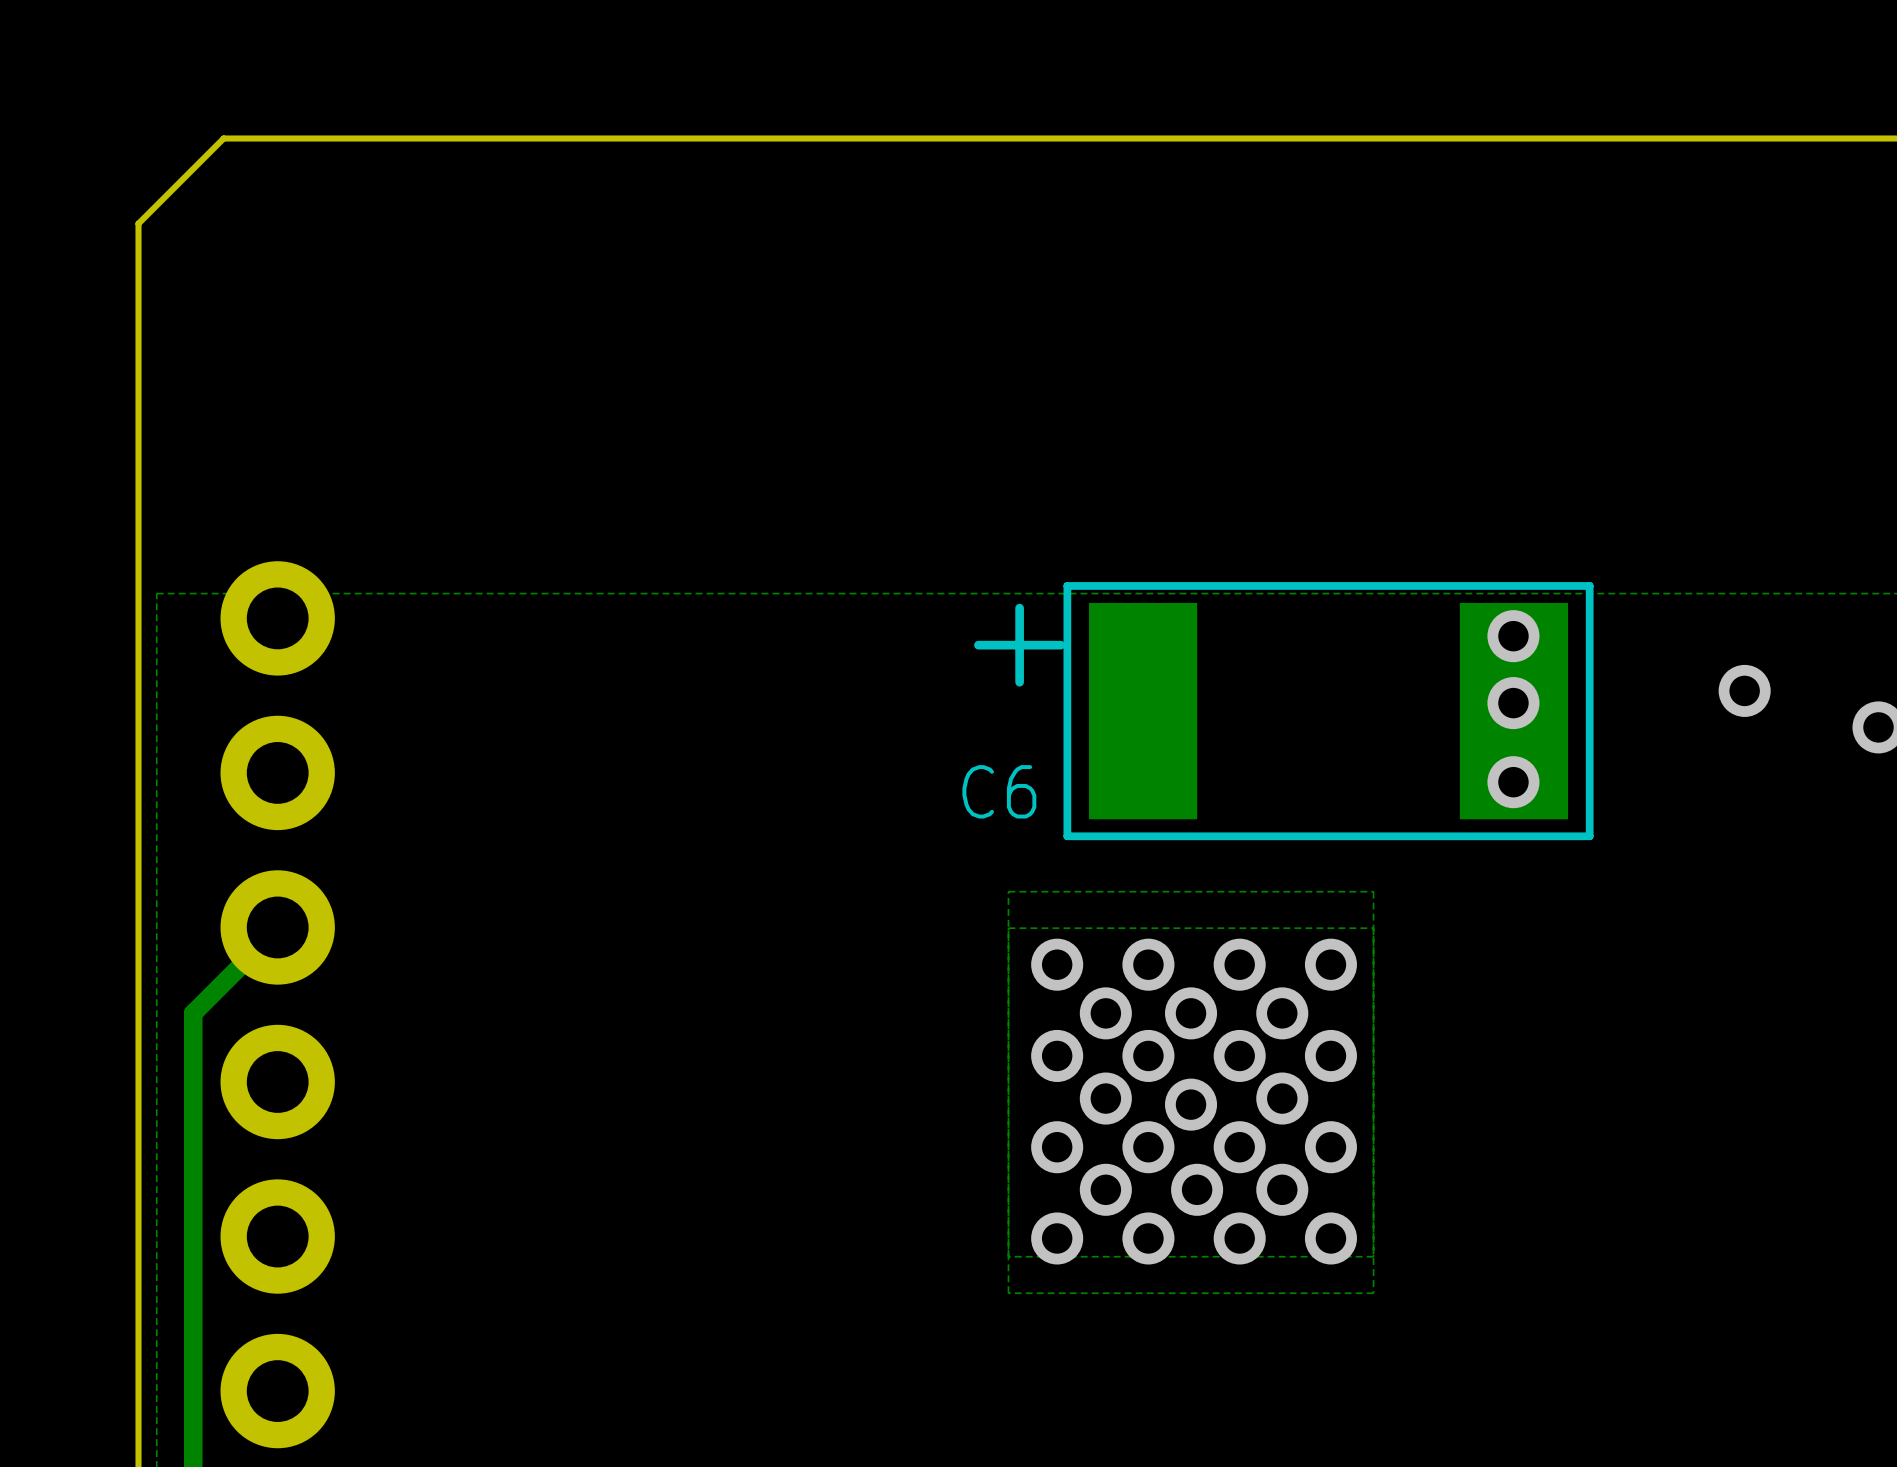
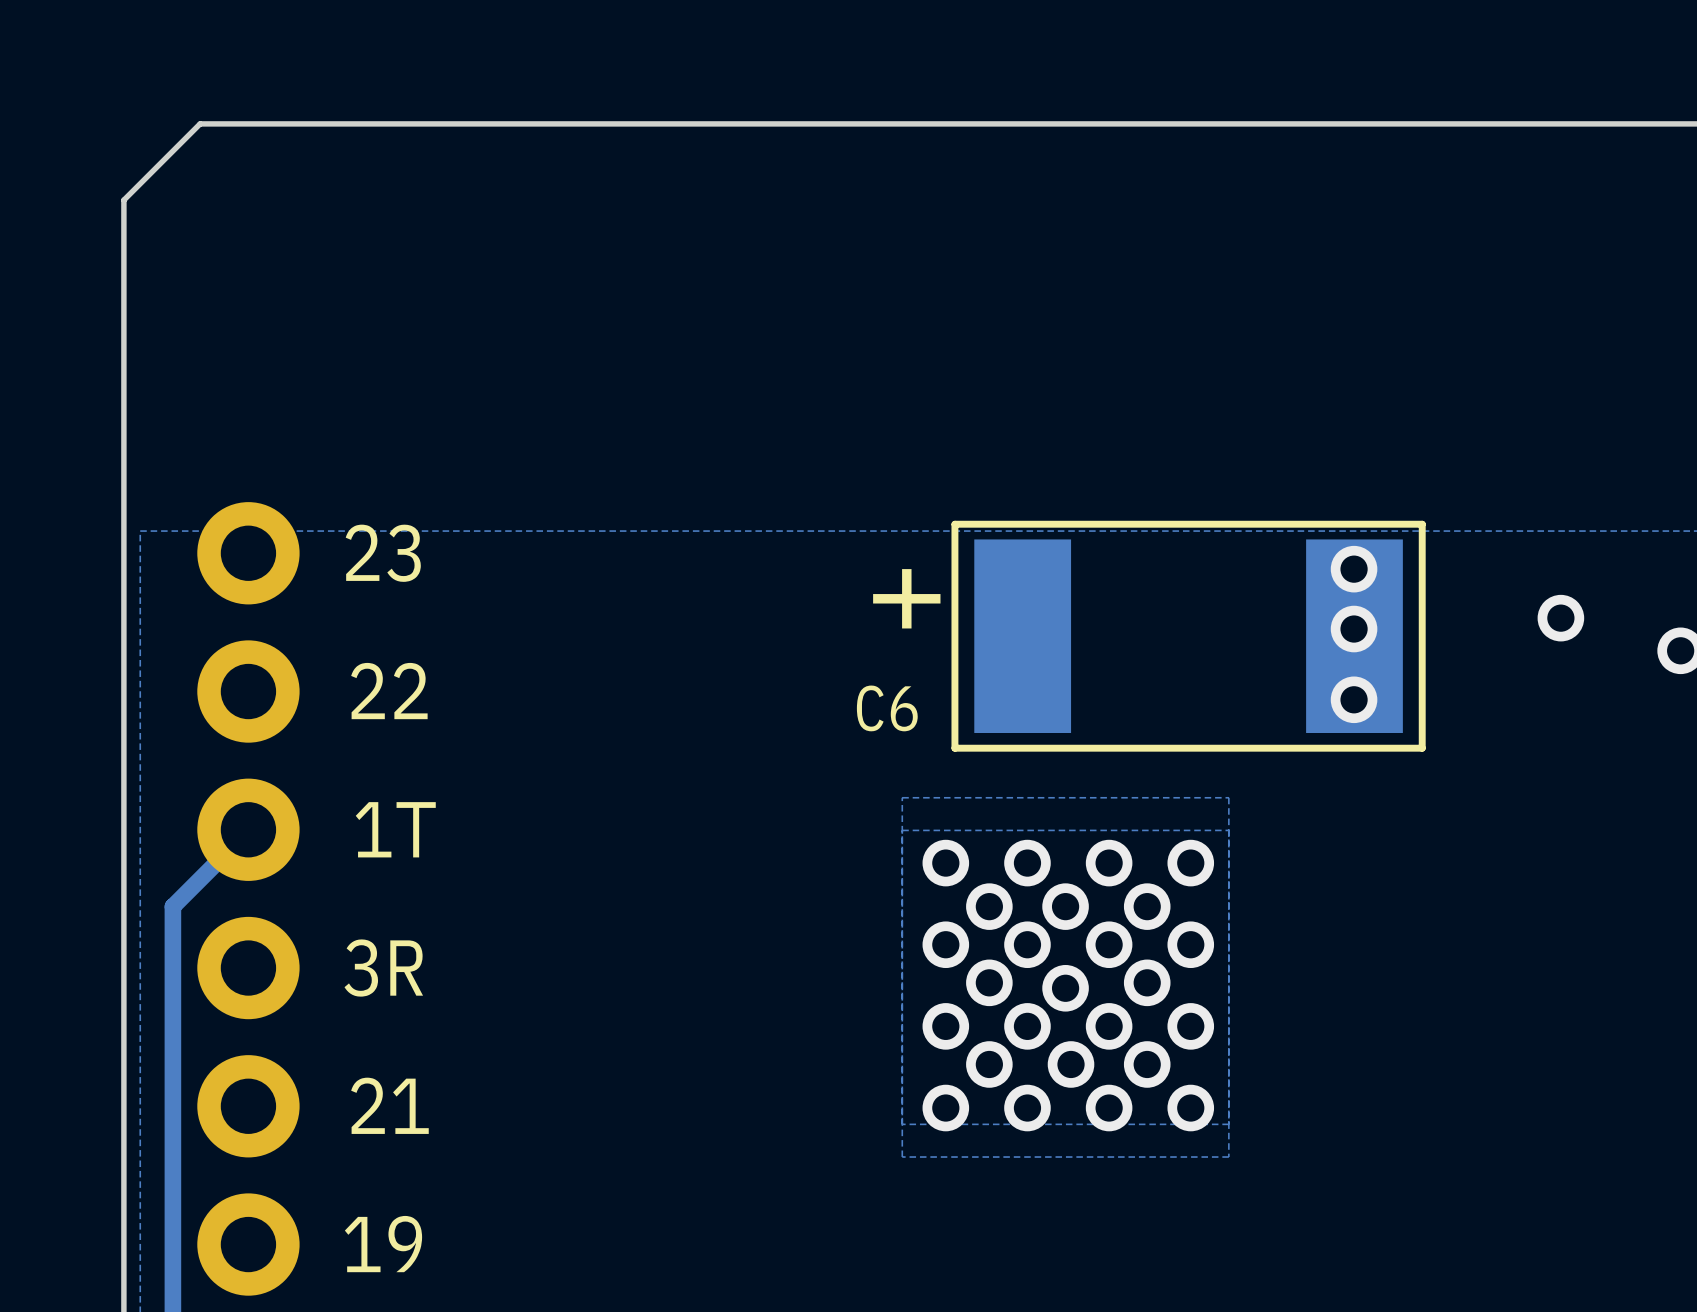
text: none -> 23 (383, 553)
text: none -> 22 (389, 691)
text: none -> 1T (395, 829)
text: none -> 3R (383, 968)
text: none -> 21 (389, 1105)
text: none -> 19 (383, 1244)

